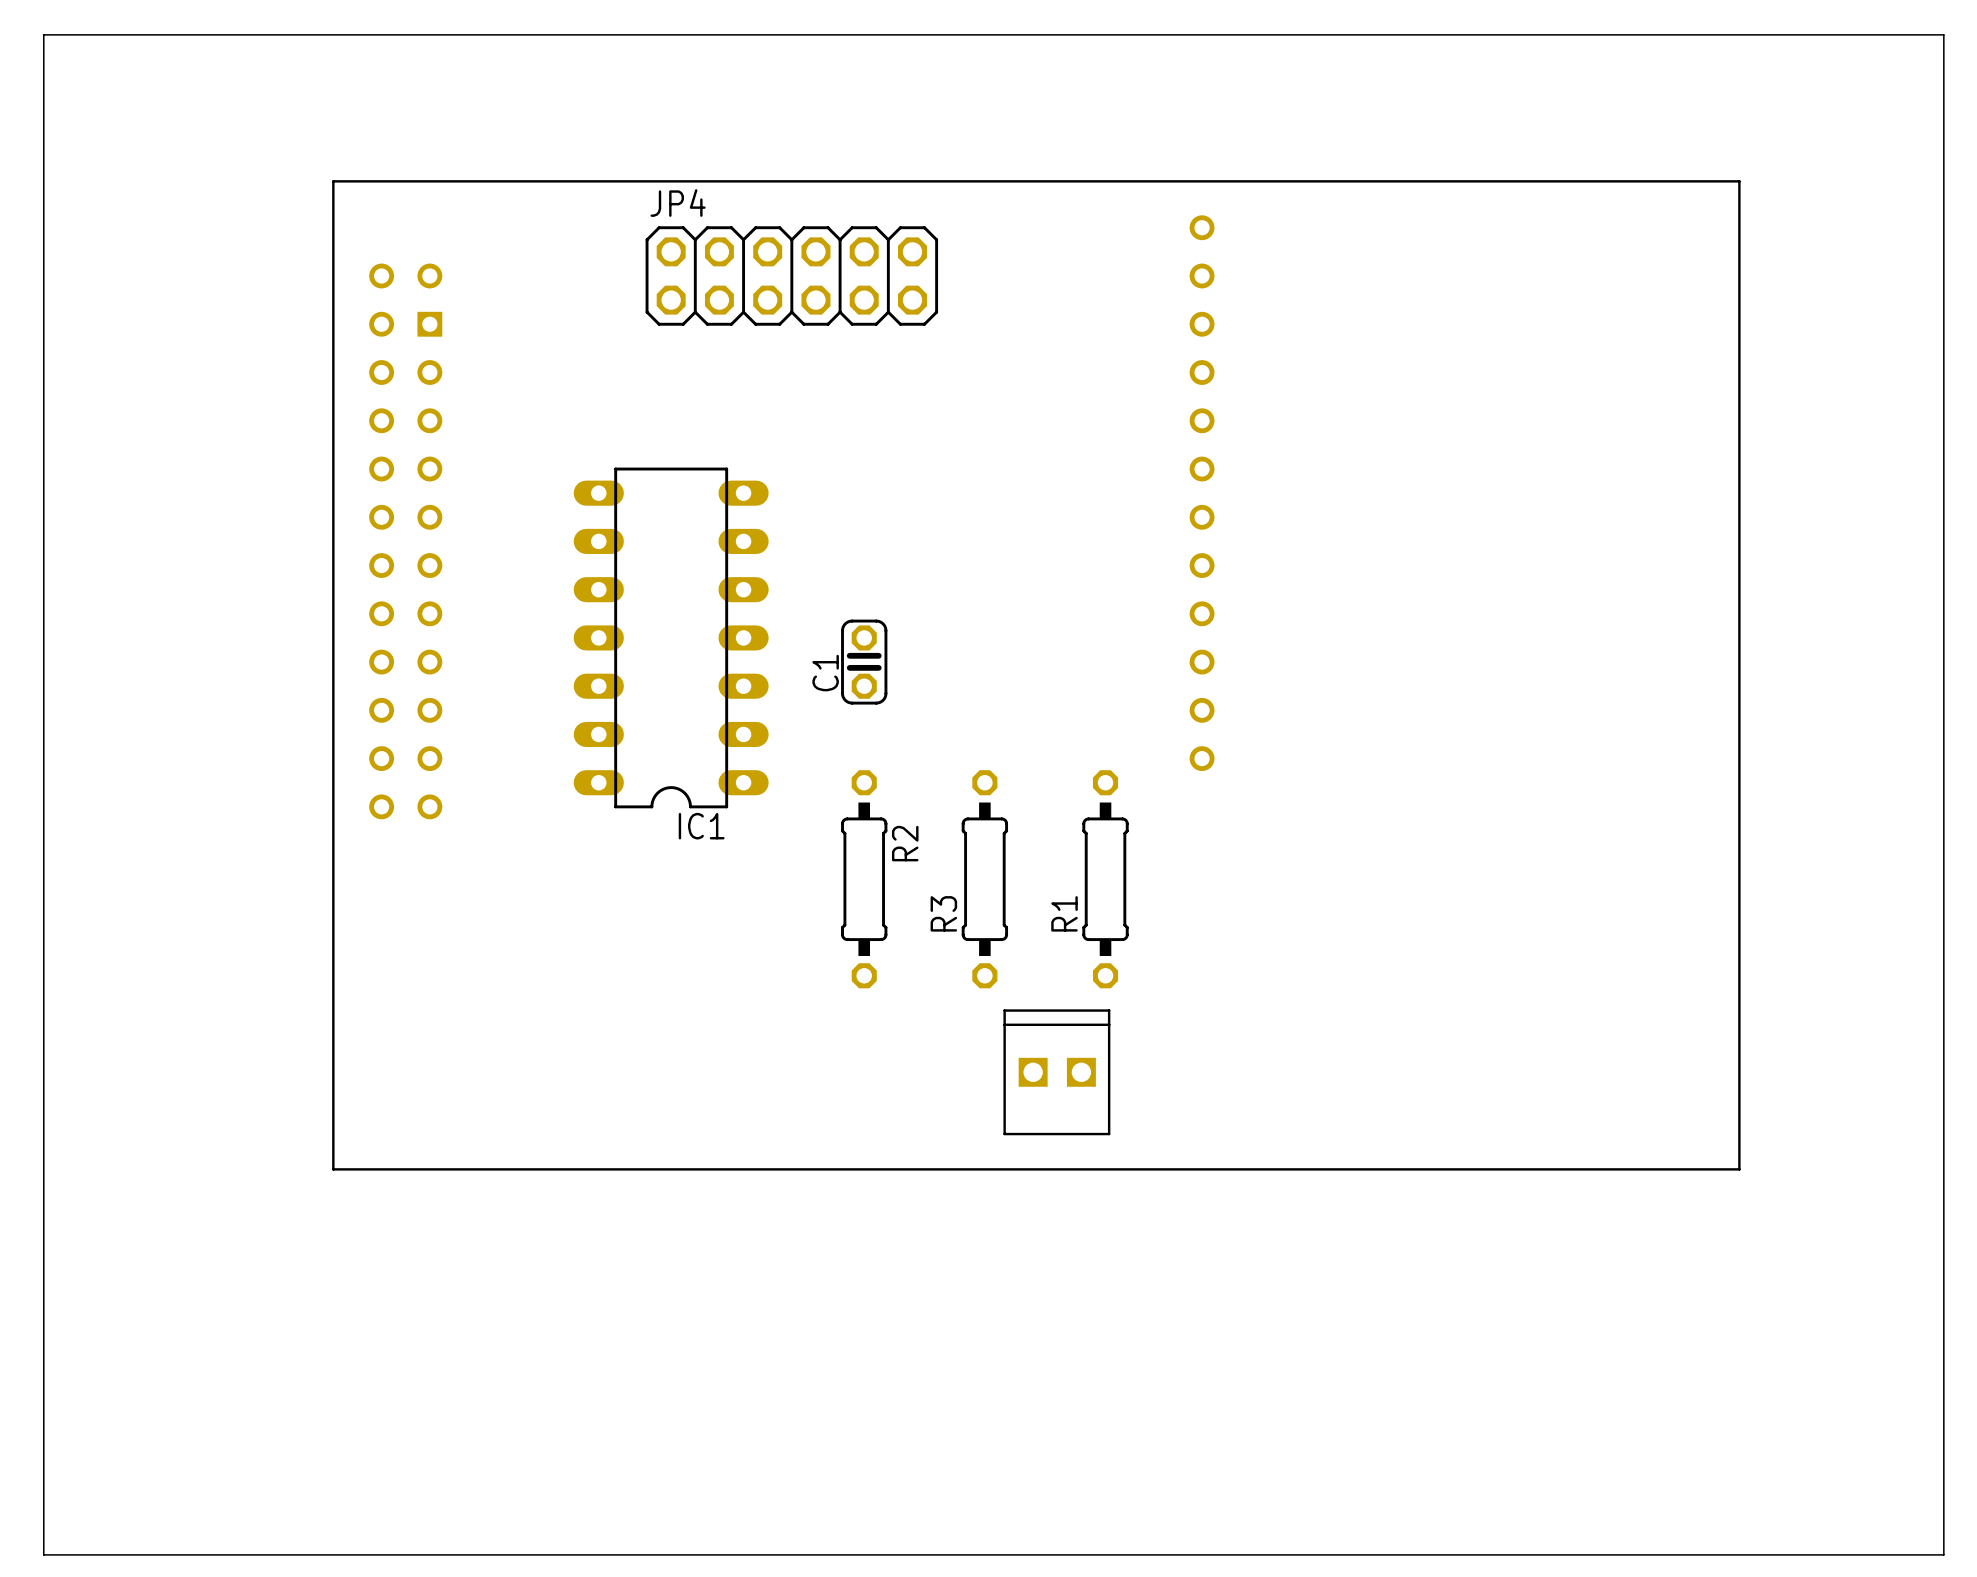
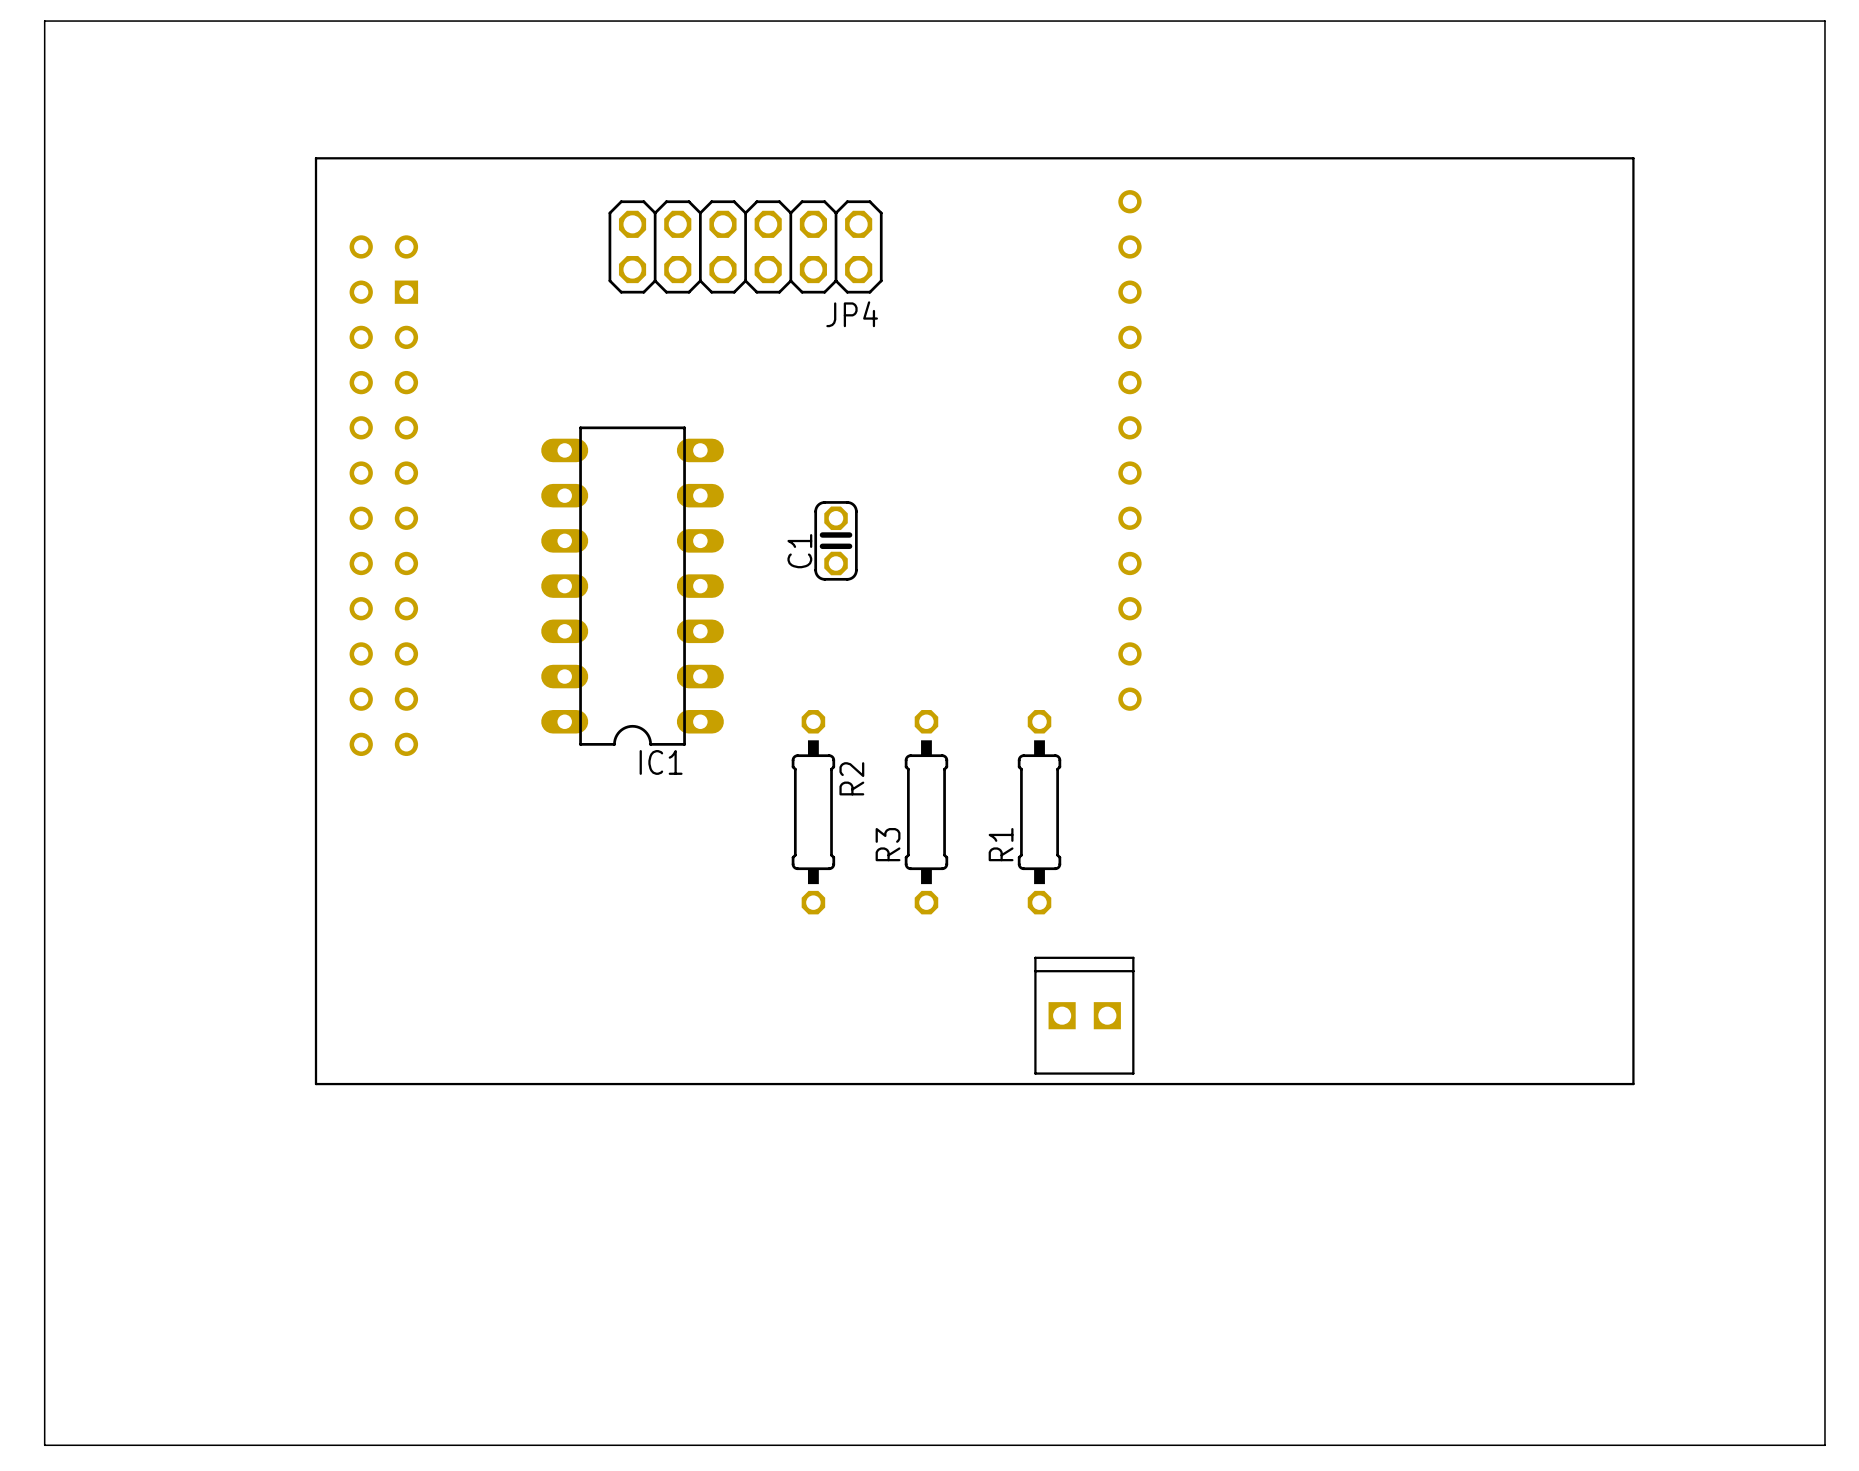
JP4 name position: JP4 (678, 203) -> JP4 (852, 314)
C1 position: (864, 662) -> (836, 540)
part position: (1056, 1072) -> (1084, 1015)

